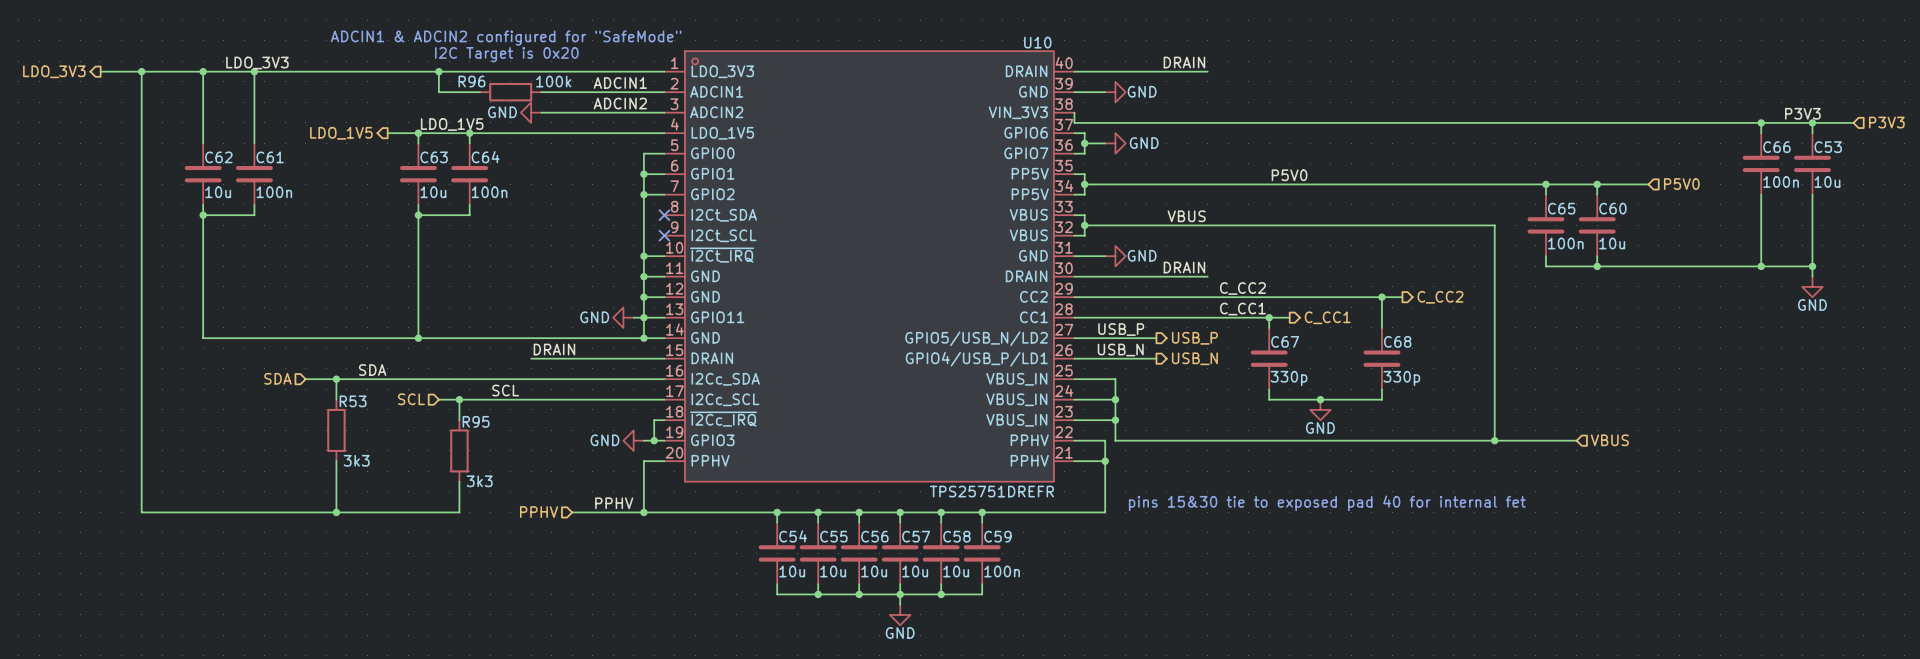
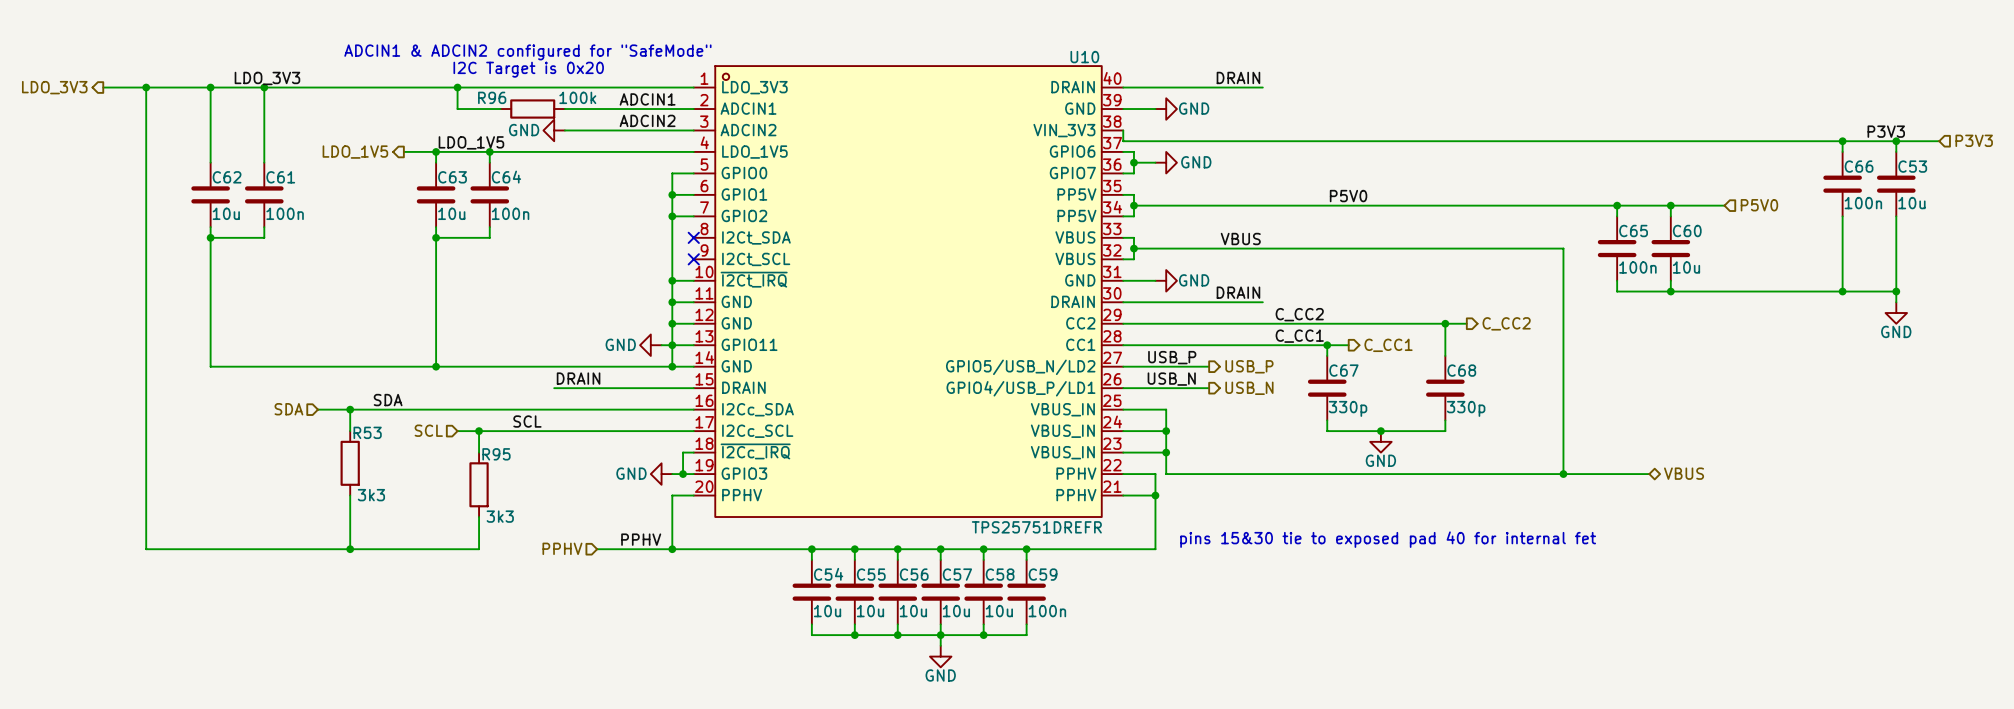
hierarchical label shape: input (1609, 440) -> bidirectional (1684, 473)

